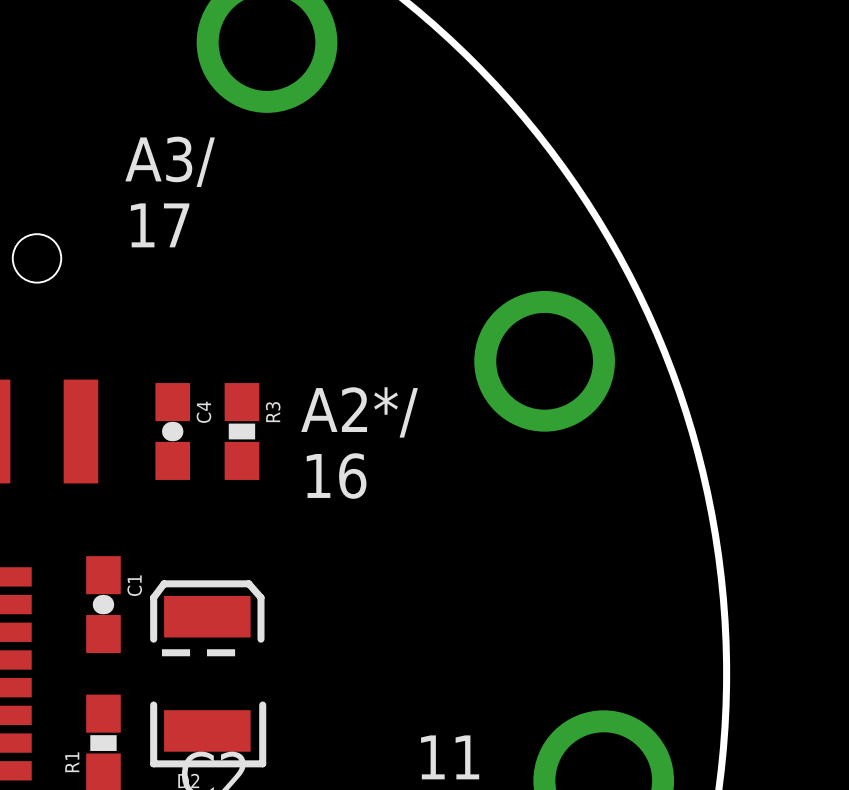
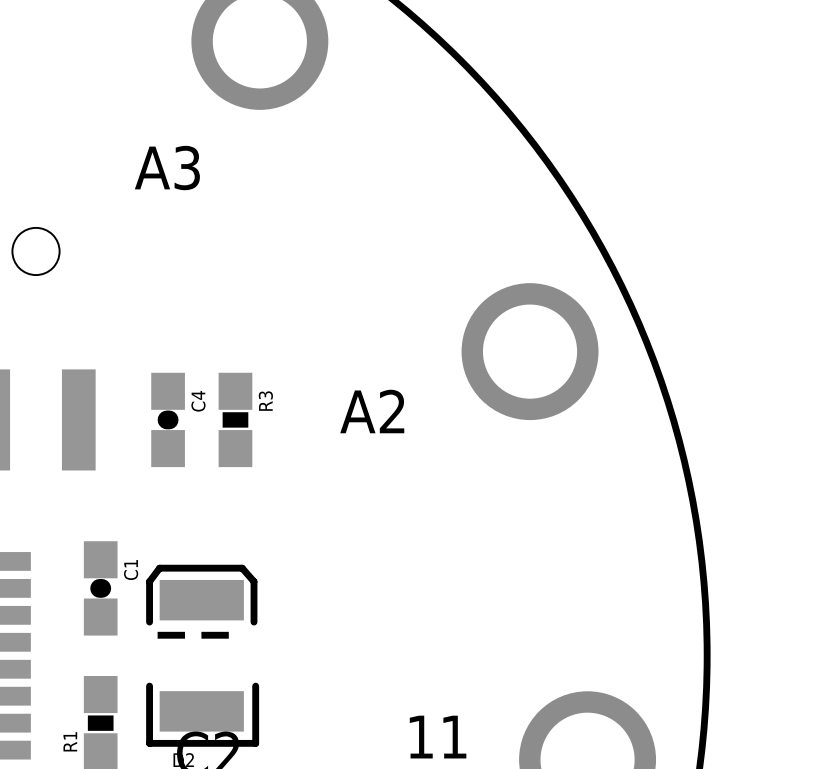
text: A3/ (170, 161) -> A3 (167, 168)
text: 17 (160, 225) -> none
text: A2*/ (359, 412) -> A2 (372, 411)
text: 16 (336, 476) -> none

